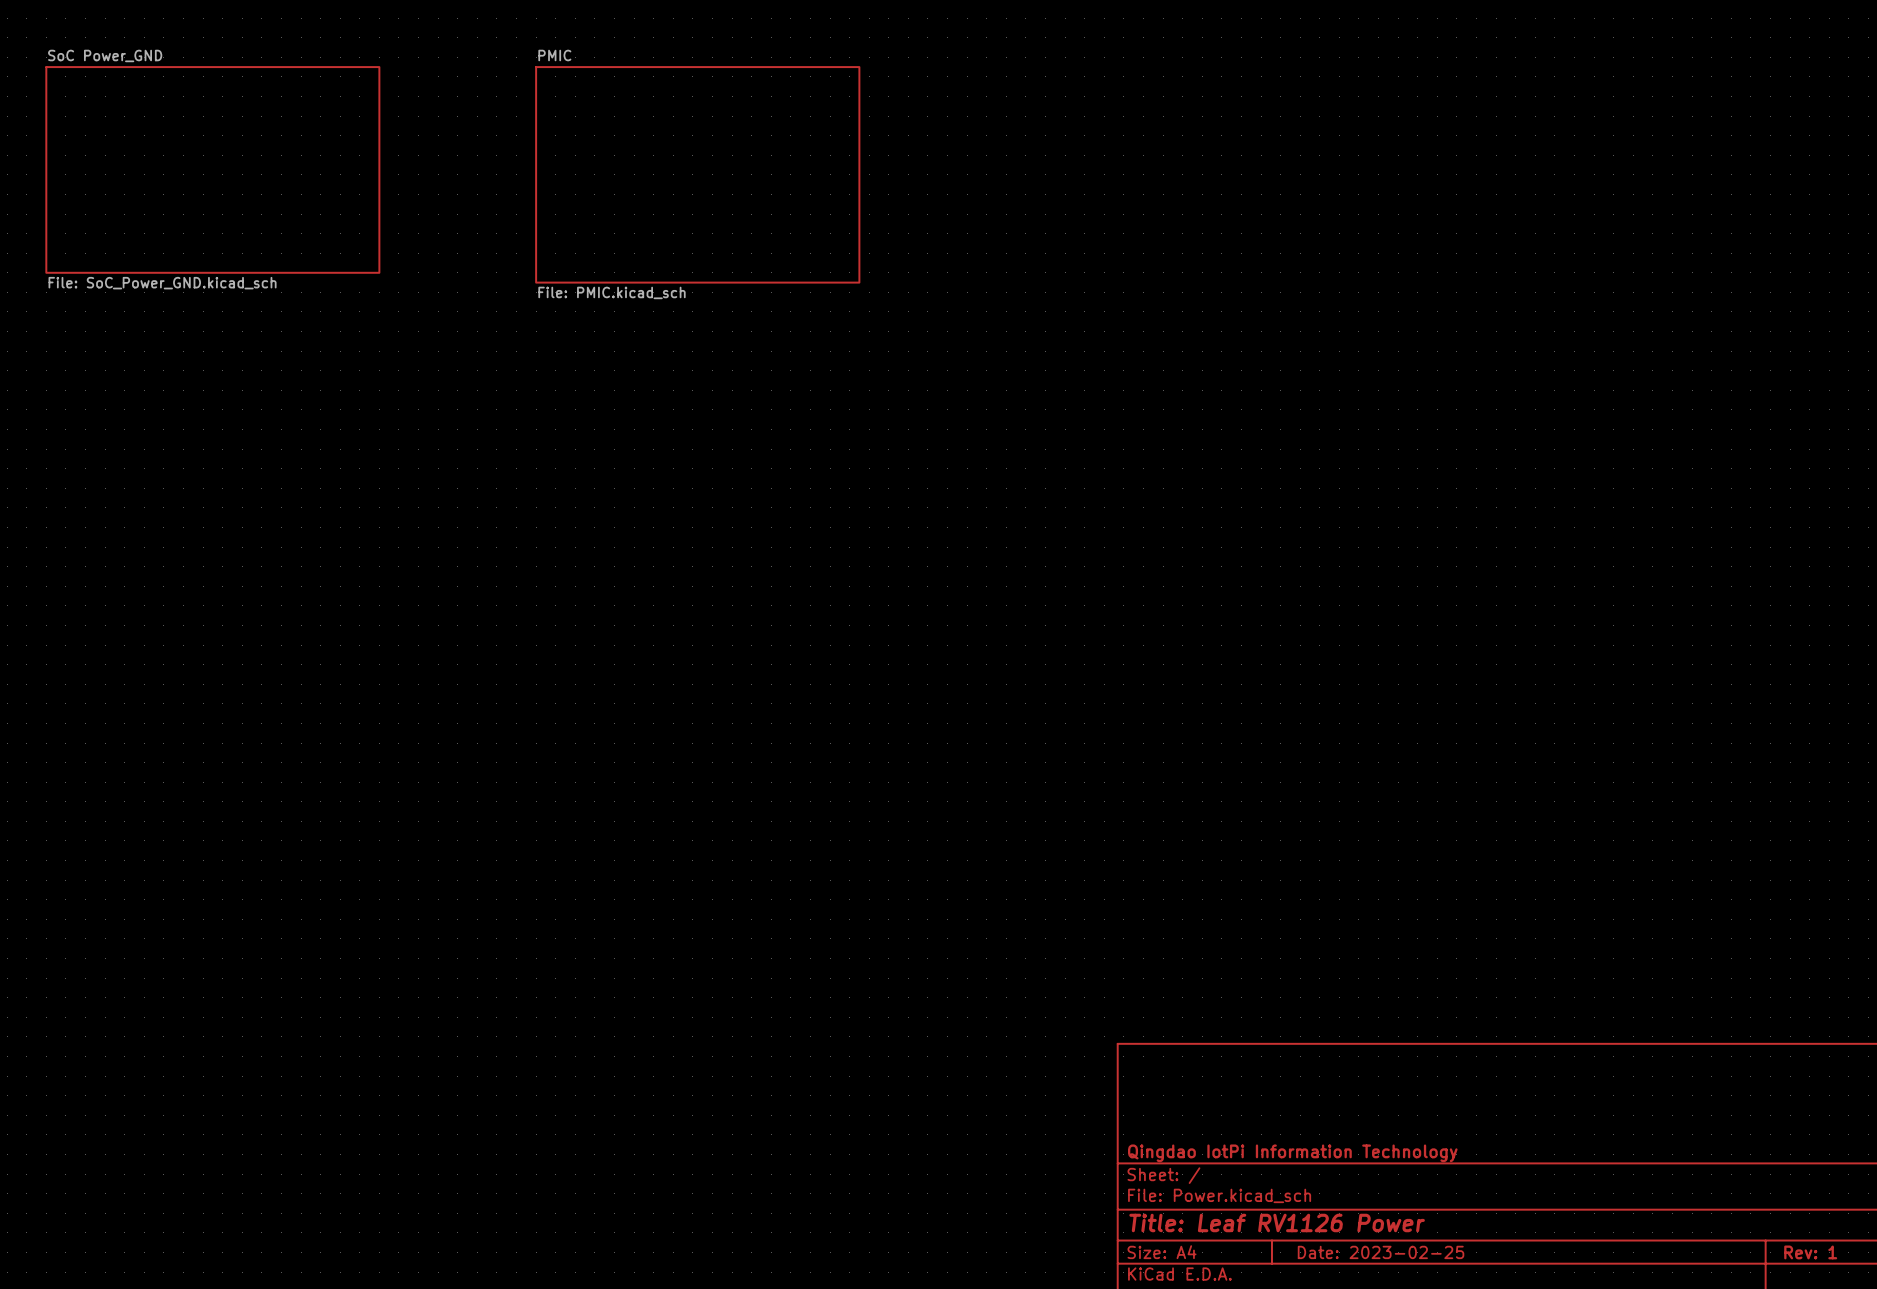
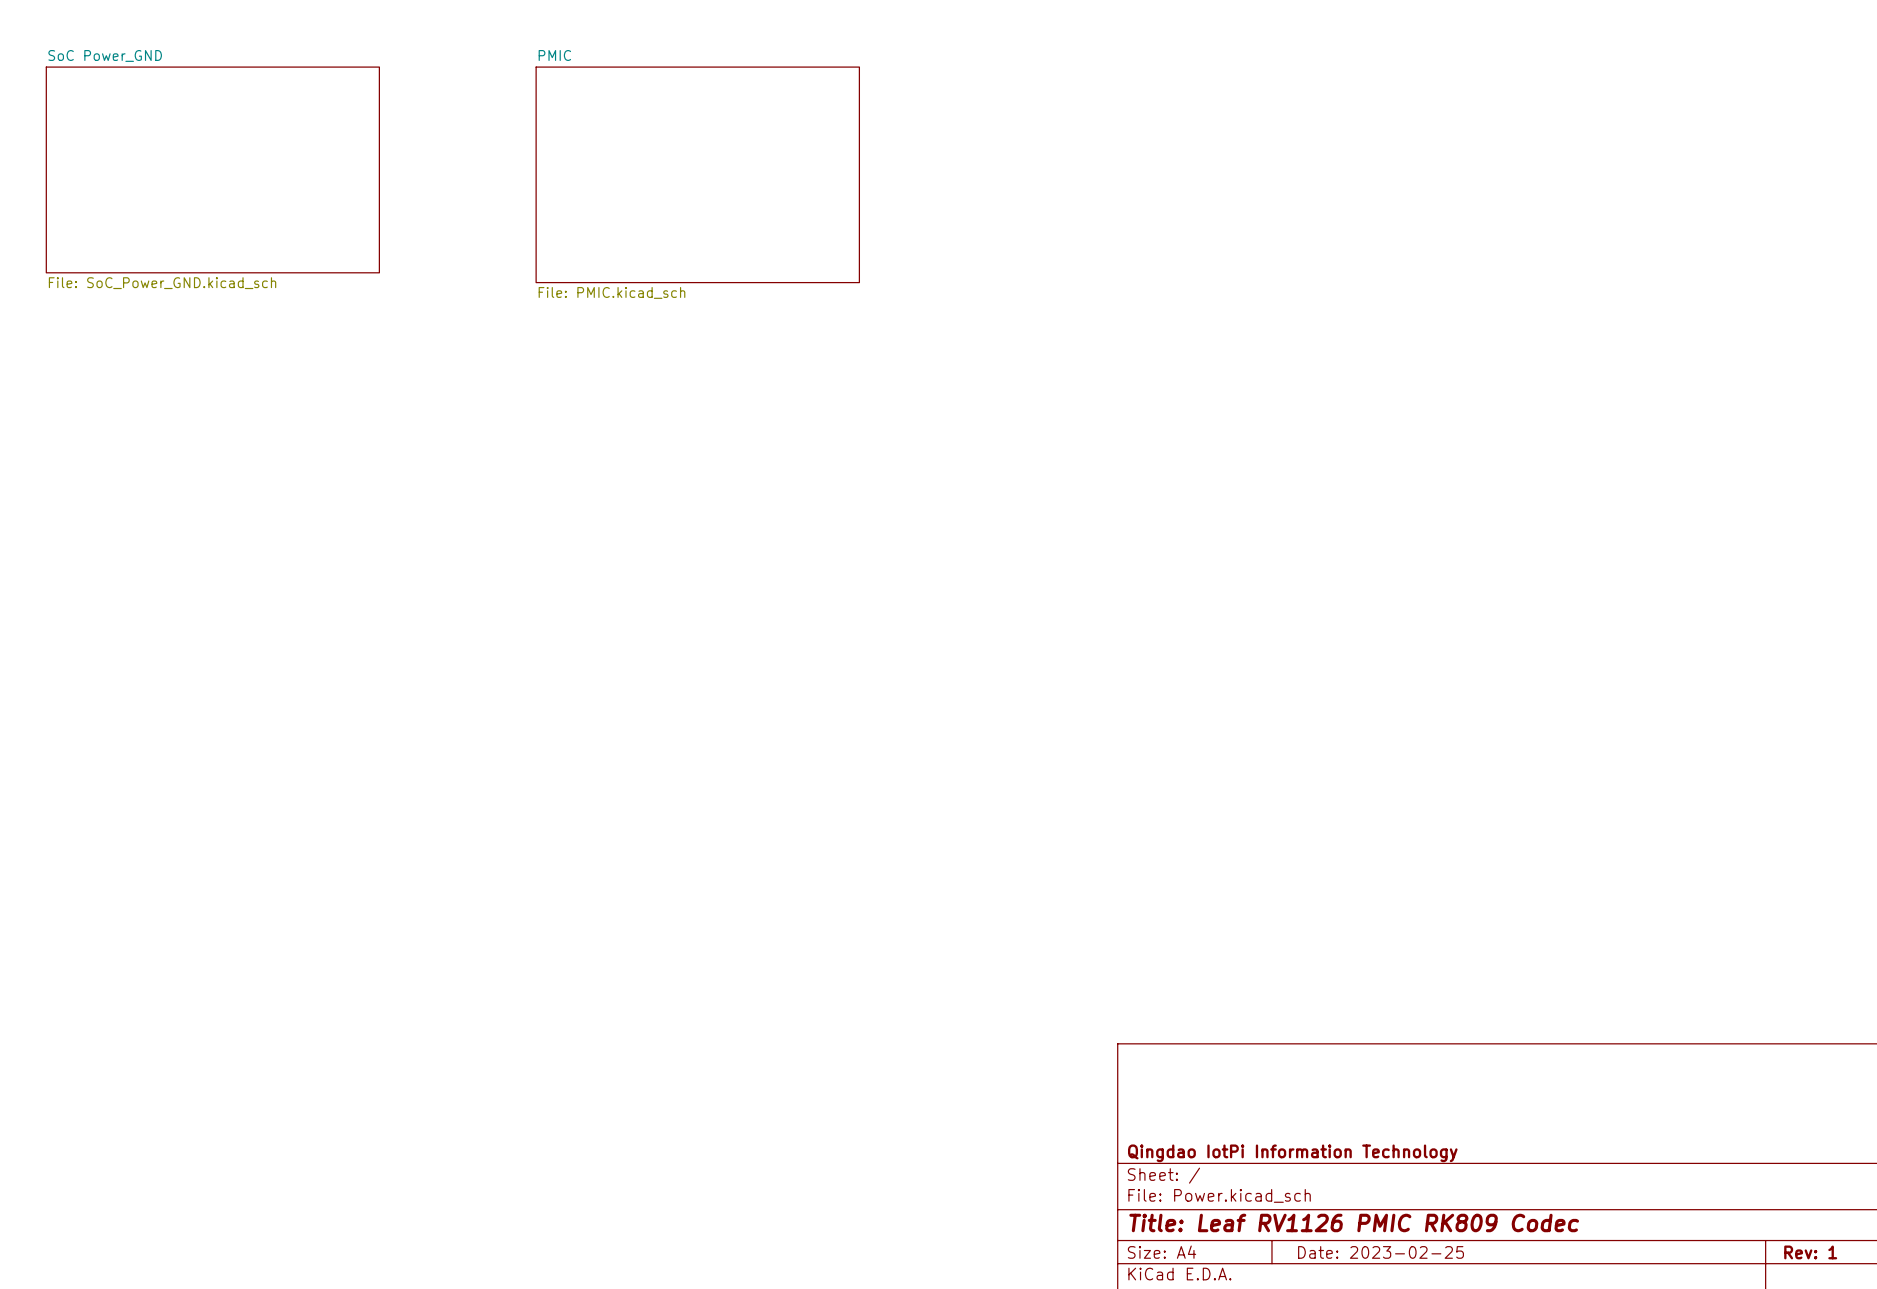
title block: Title: Leaf RV1126 Power (1277, 1222) -> Title: Leaf RV1126 PMIC RK809 Codec (1354, 1222)

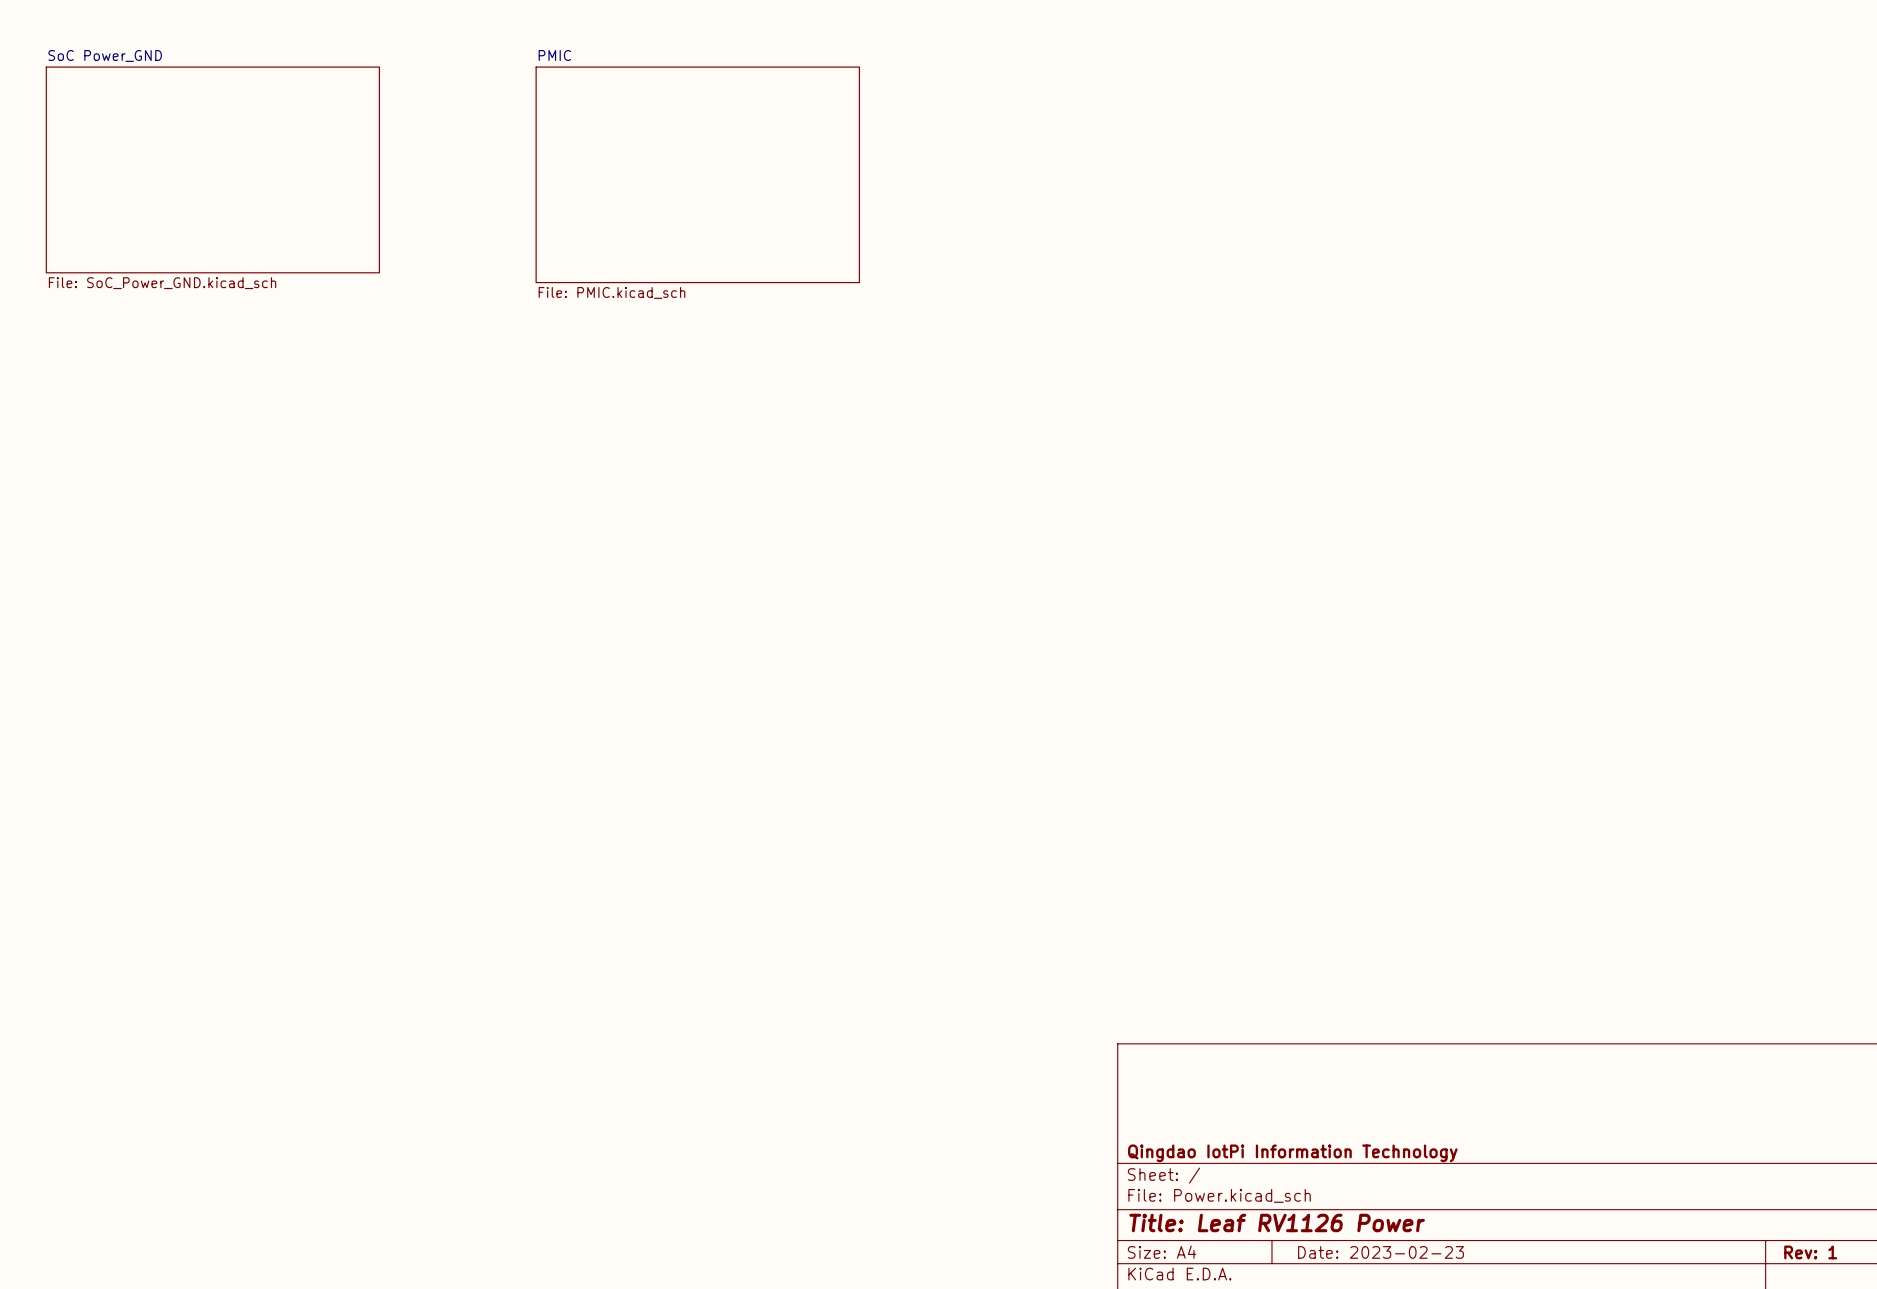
title block: Title: Leaf RV1126 PMIC RK809 Codec (1354, 1222) -> Title: Leaf RV1126 Power (1277, 1222)
title block: Date: 2023-02-25 (1381, 1252) -> Date: 2023-02-23 (1381, 1252)

